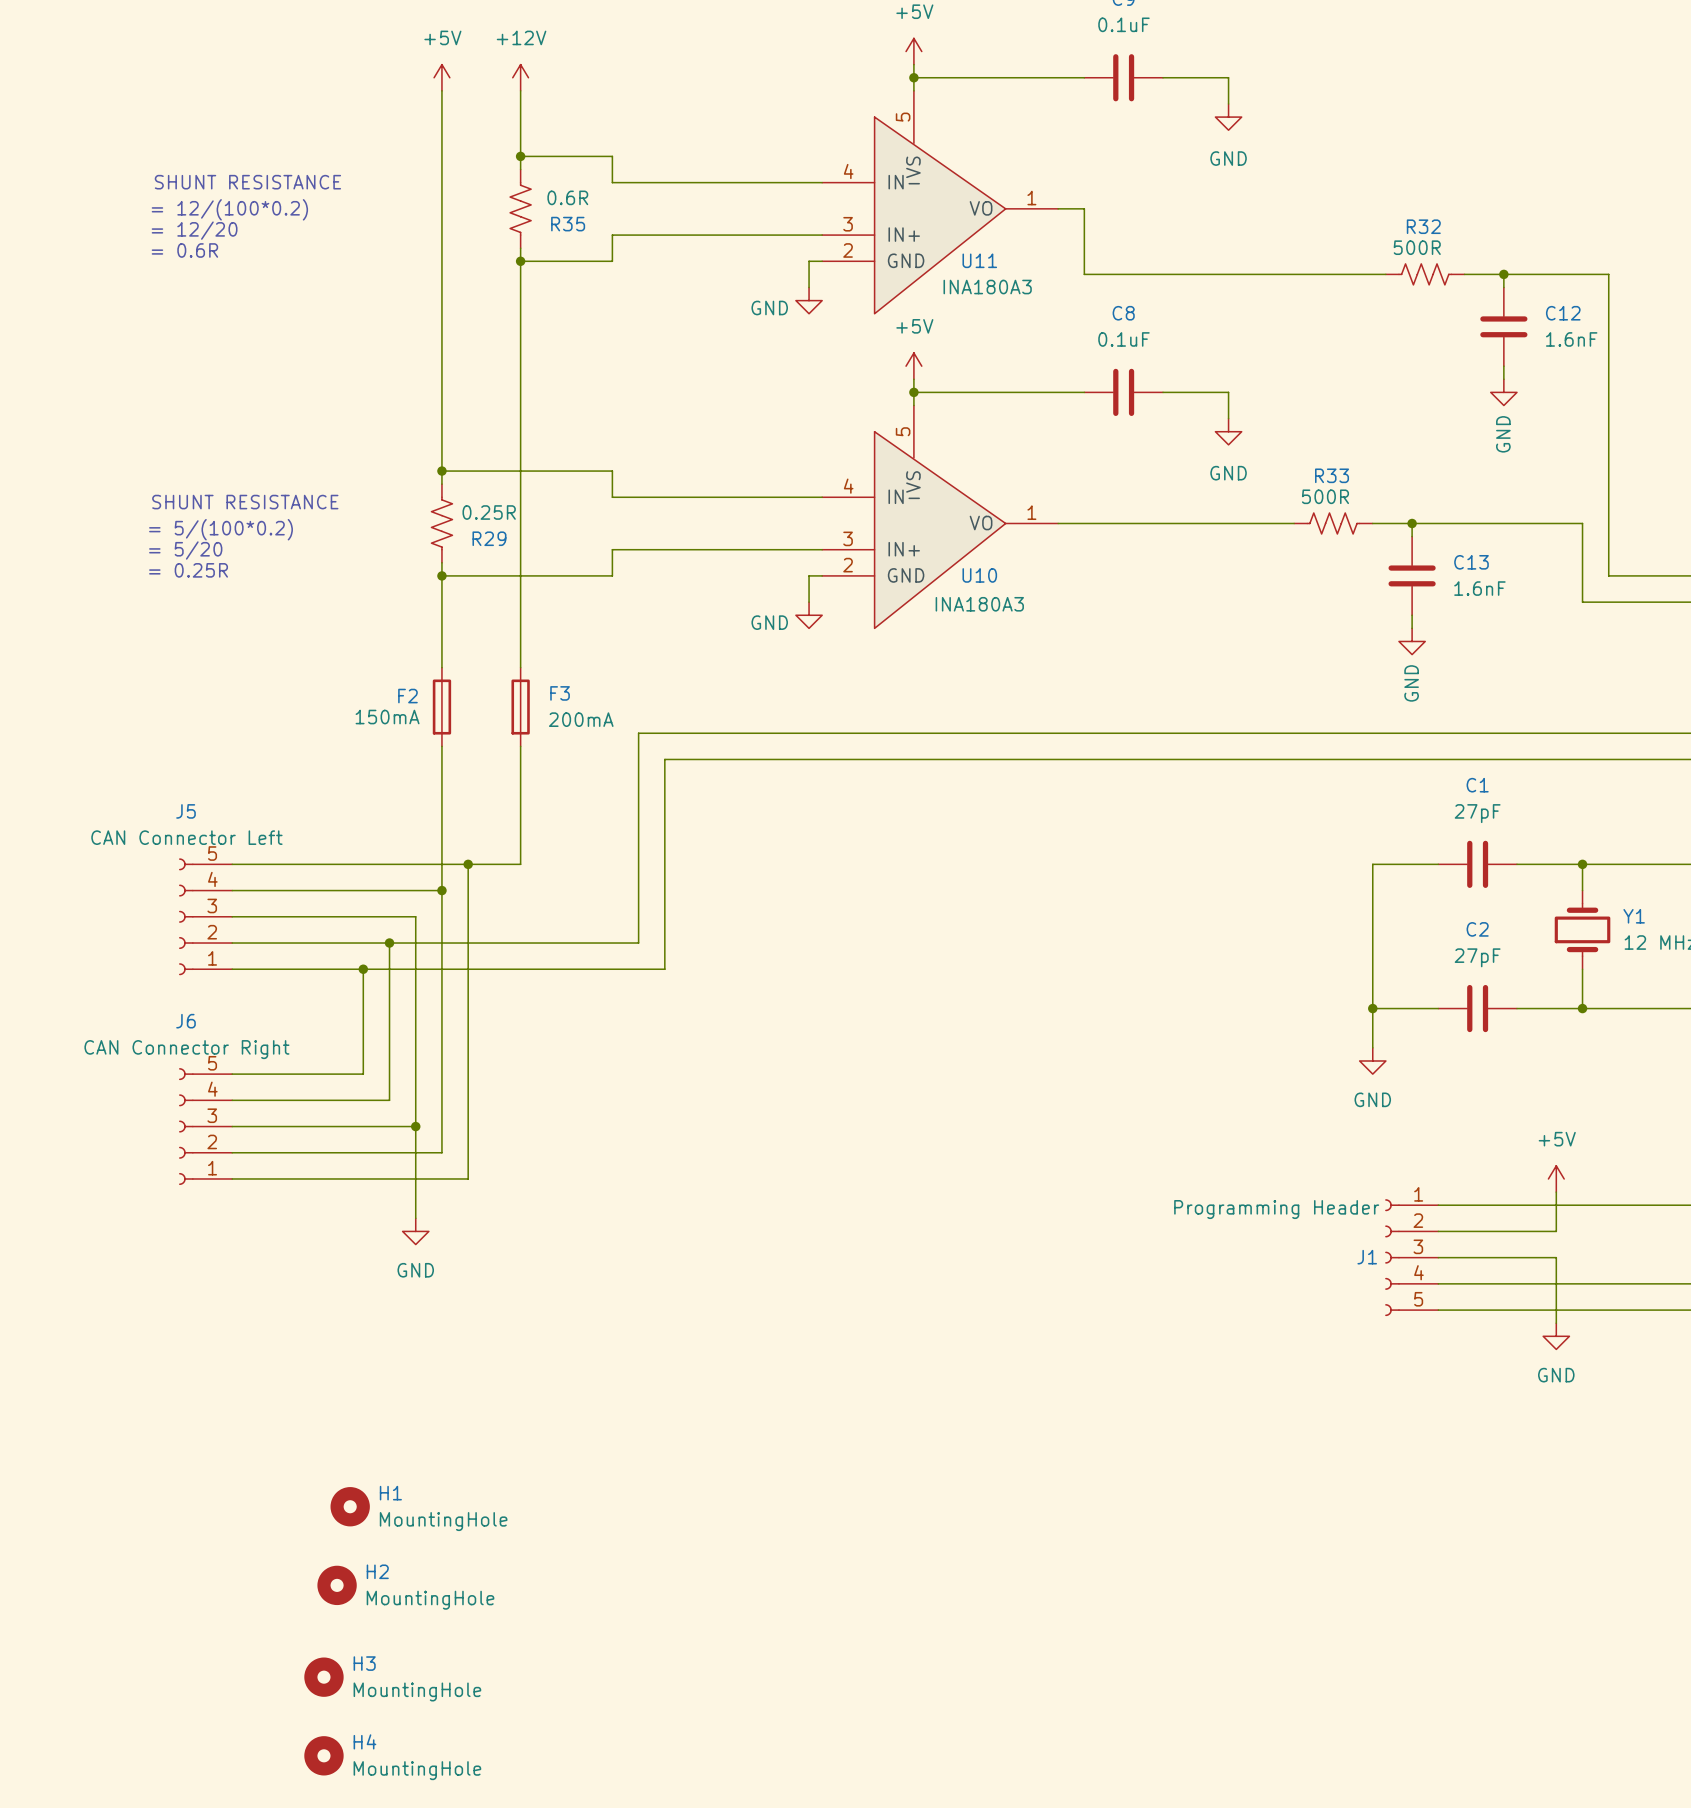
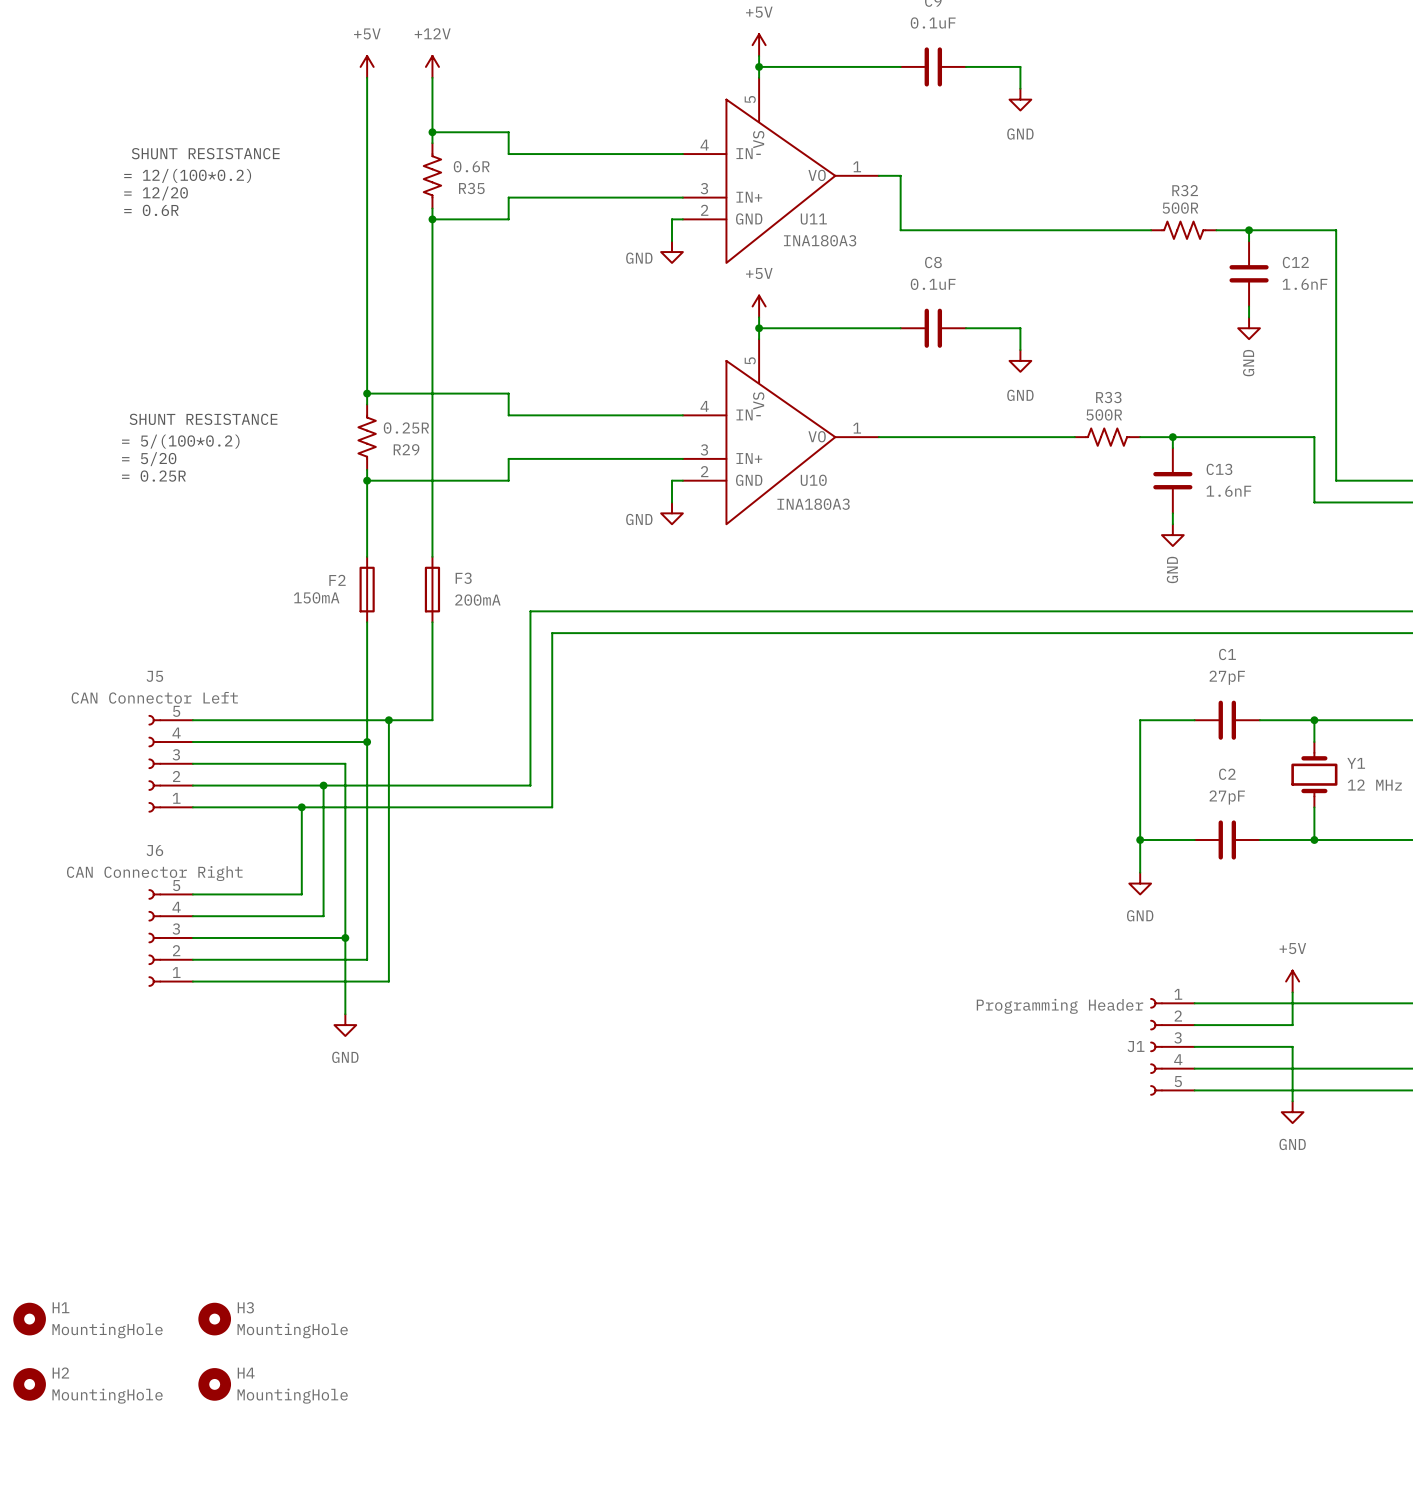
H1 position: (350, 1506) -> (29, 1319)
H2 position: (337, 1585) -> (29, 1384)
H3 position: (323, 1677) -> (214, 1319)
H4 position: (323, 1755) -> (214, 1384)

